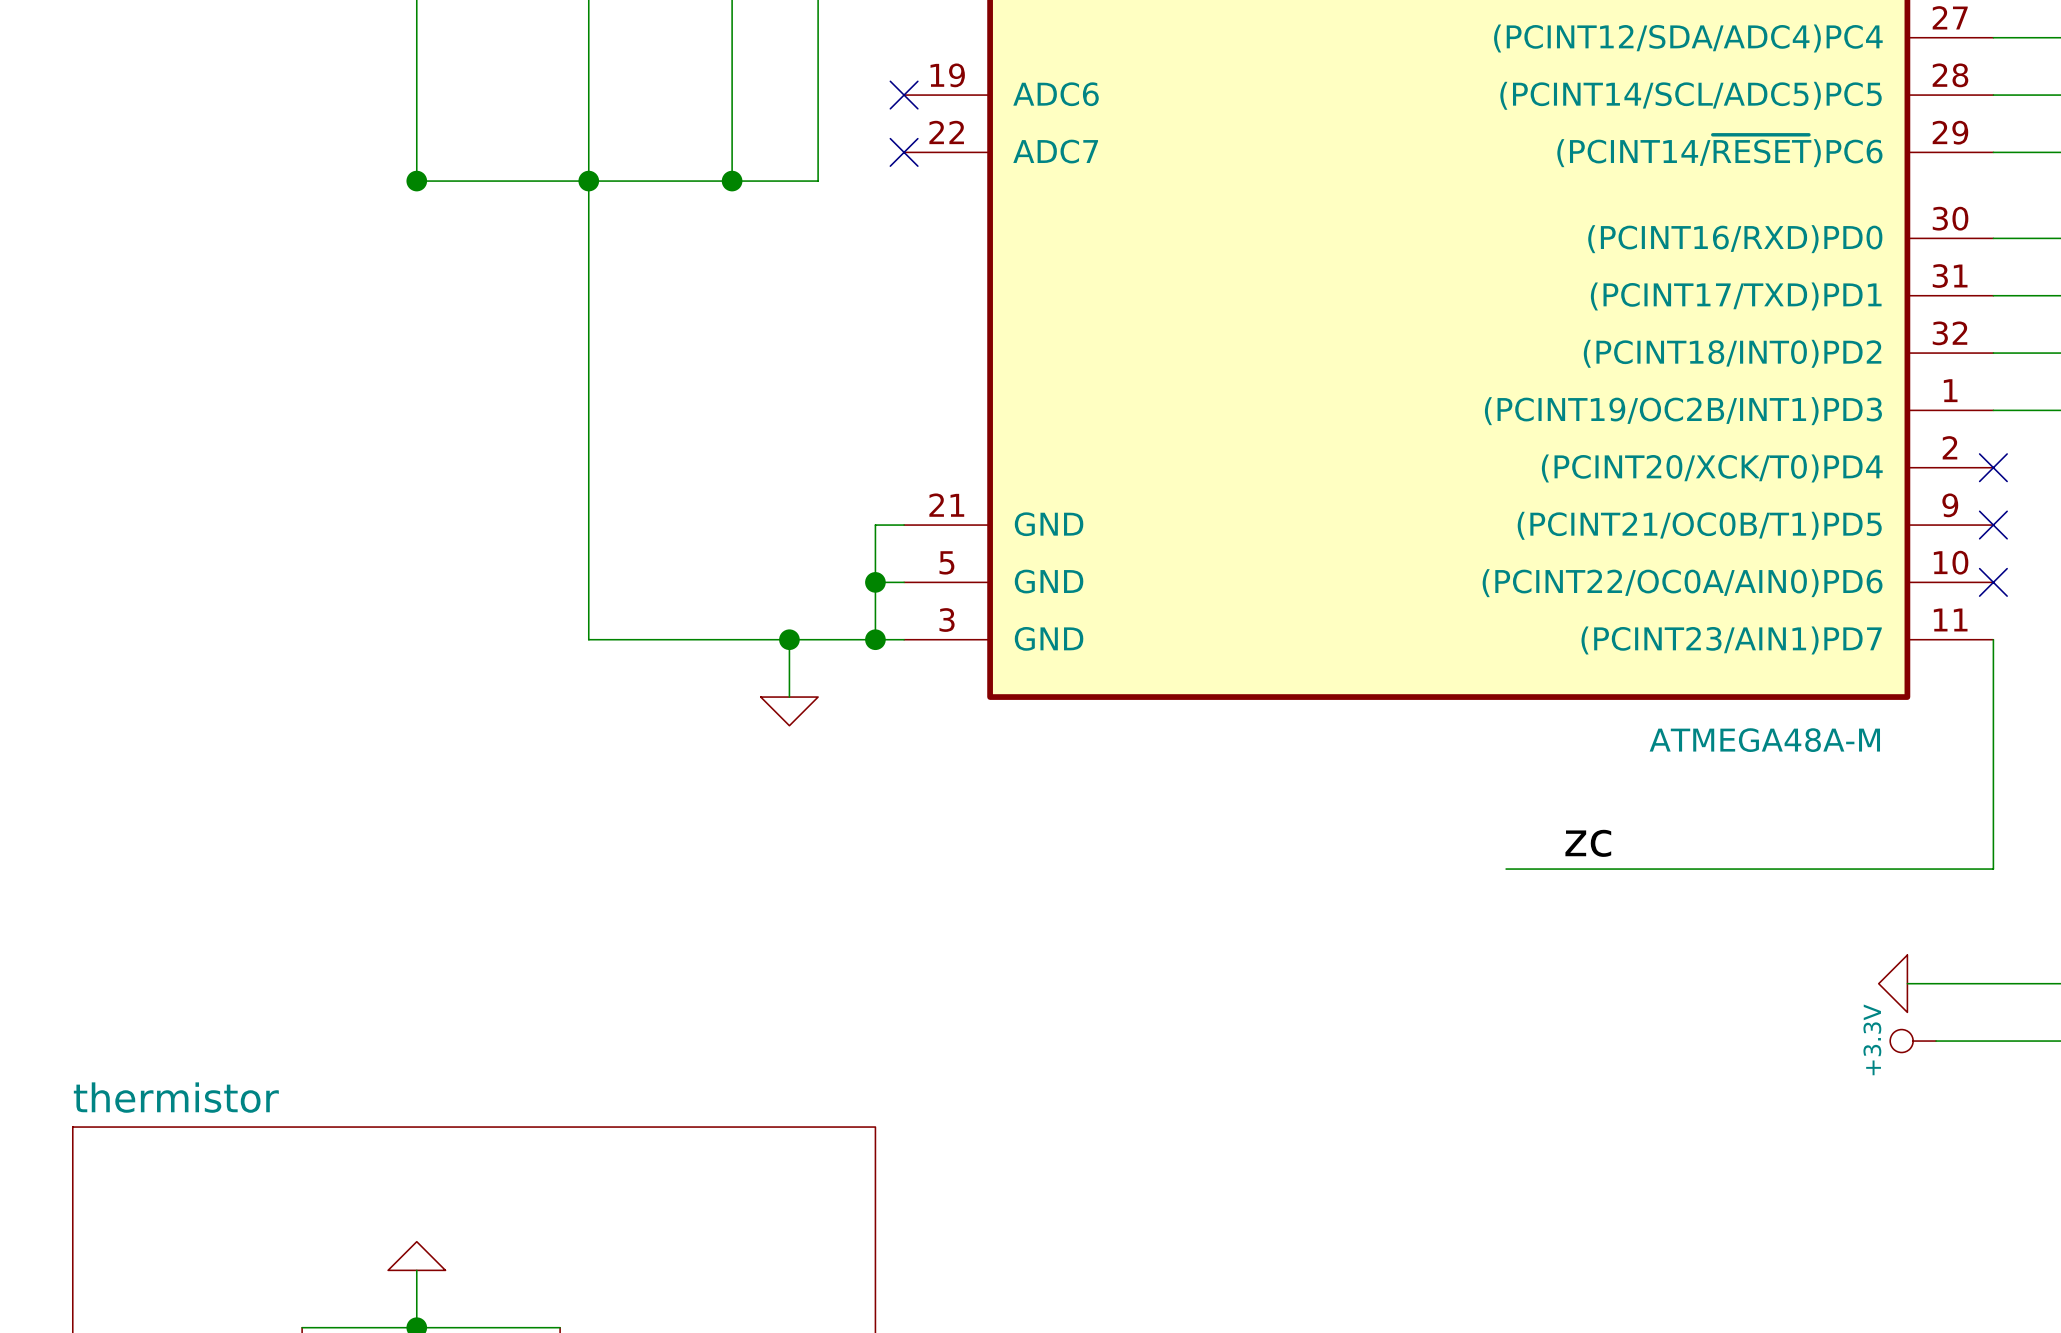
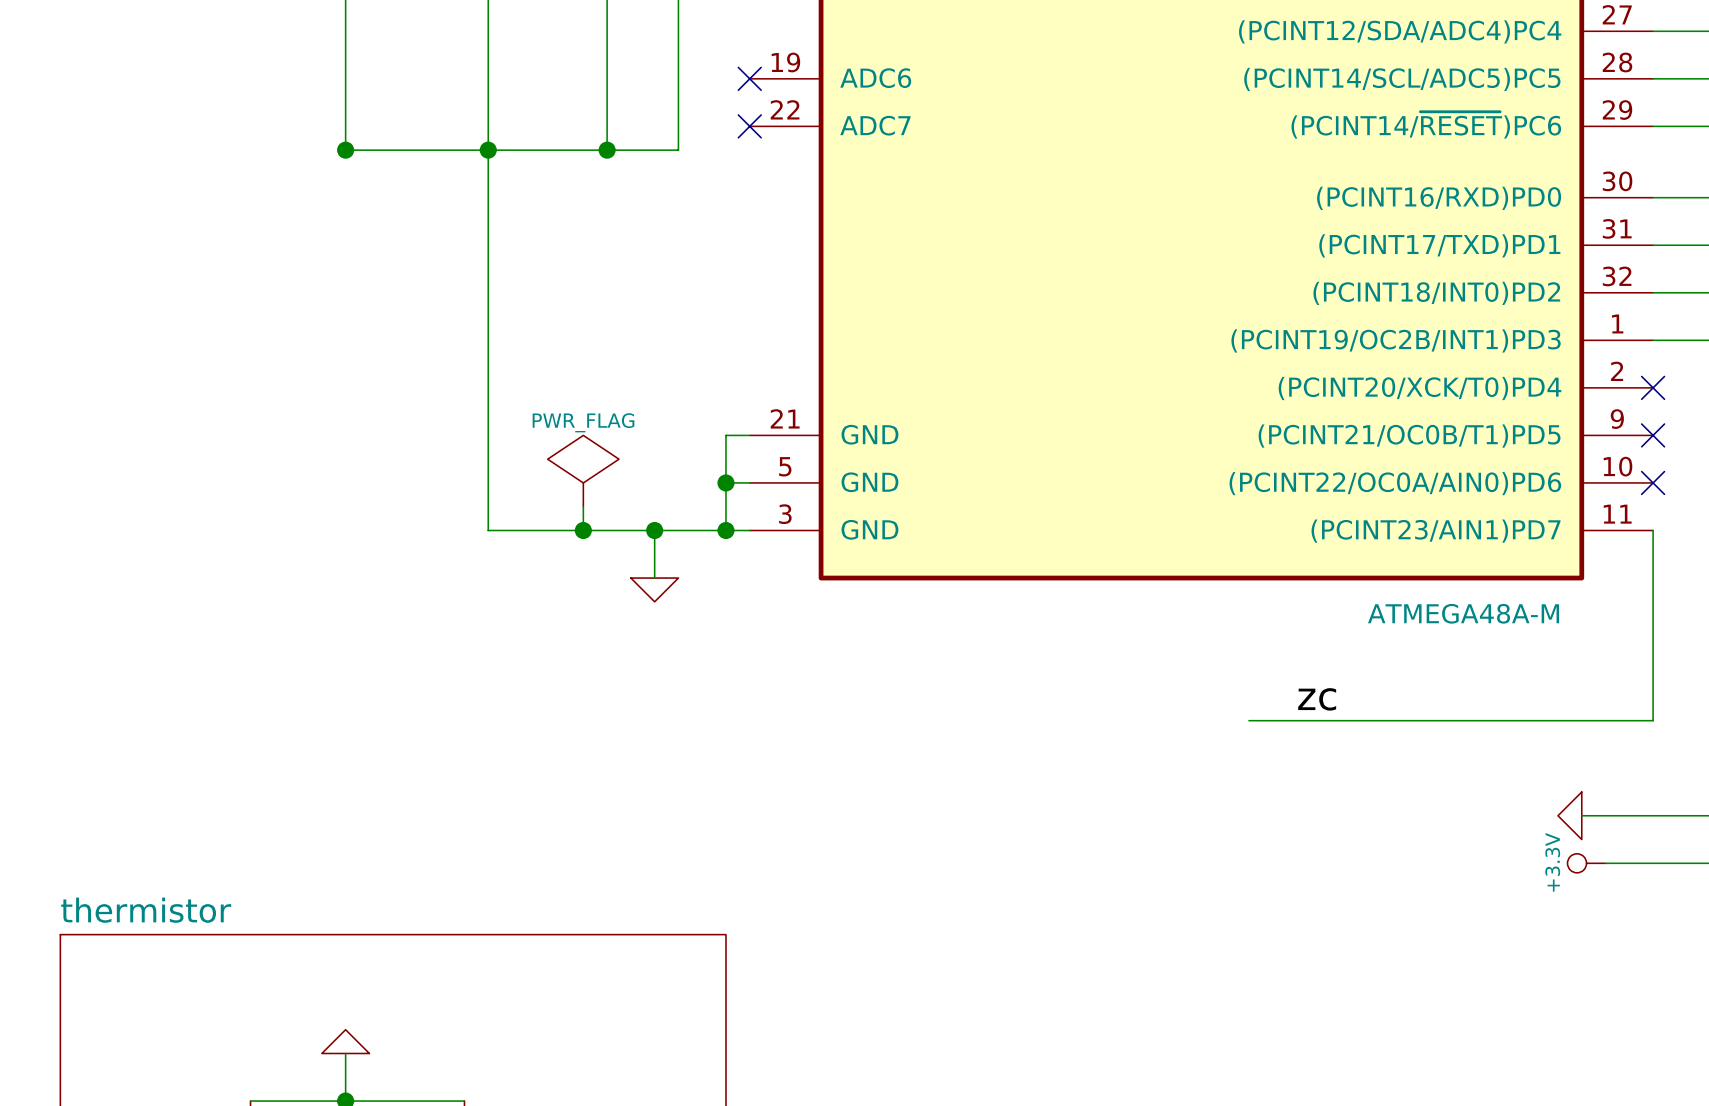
power symbol: none -> PWR_FLAG (583, 471)
wire: none -> (583, 506) (583, 530)
junction: none -> (583, 530)

